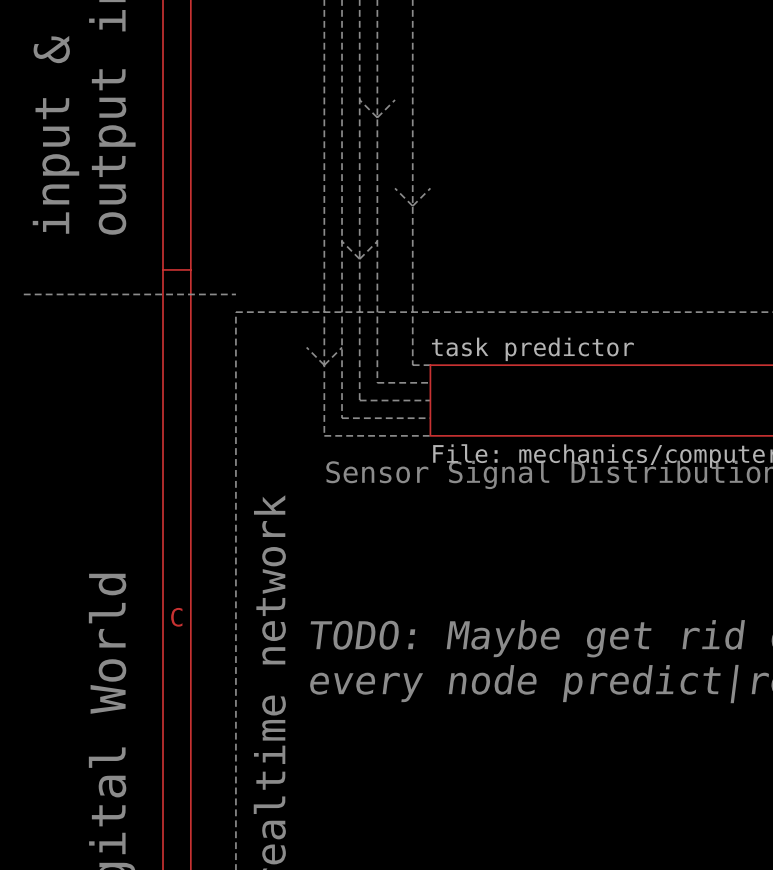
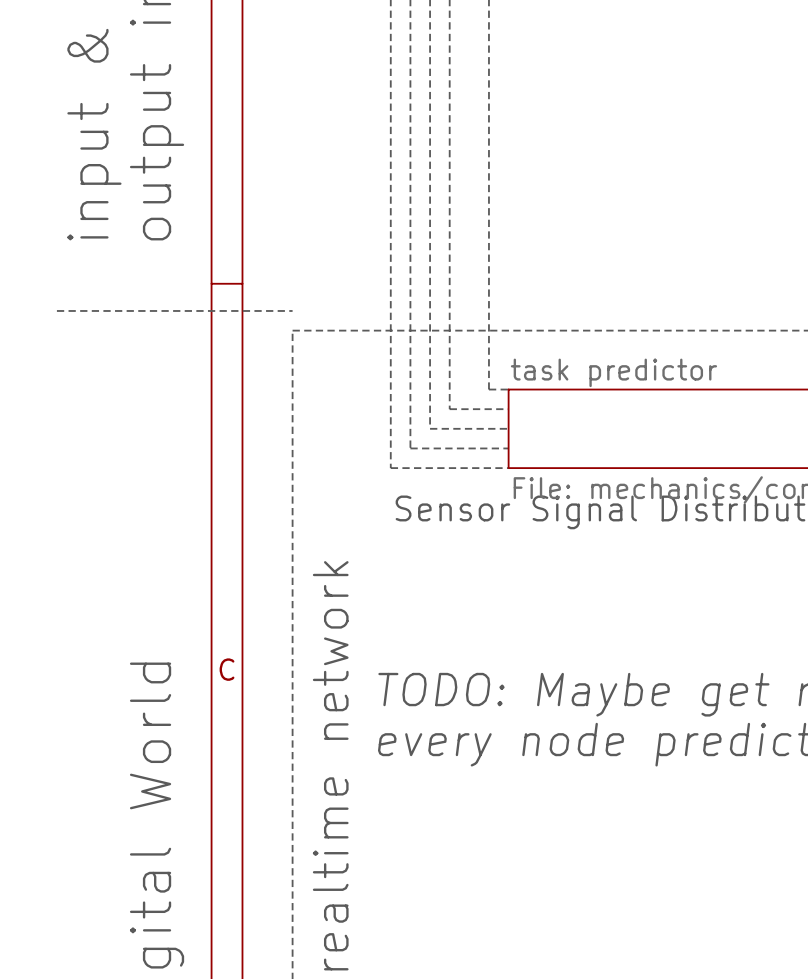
line: (359, 99) (377, 117) (395, 99) -> none
line: (395, 188) (412, 206) (430, 188) -> none
line: (342, 241) (359, 259) (377, 241) -> none
line: (306, 347) (324, 365) (342, 347) -> none

